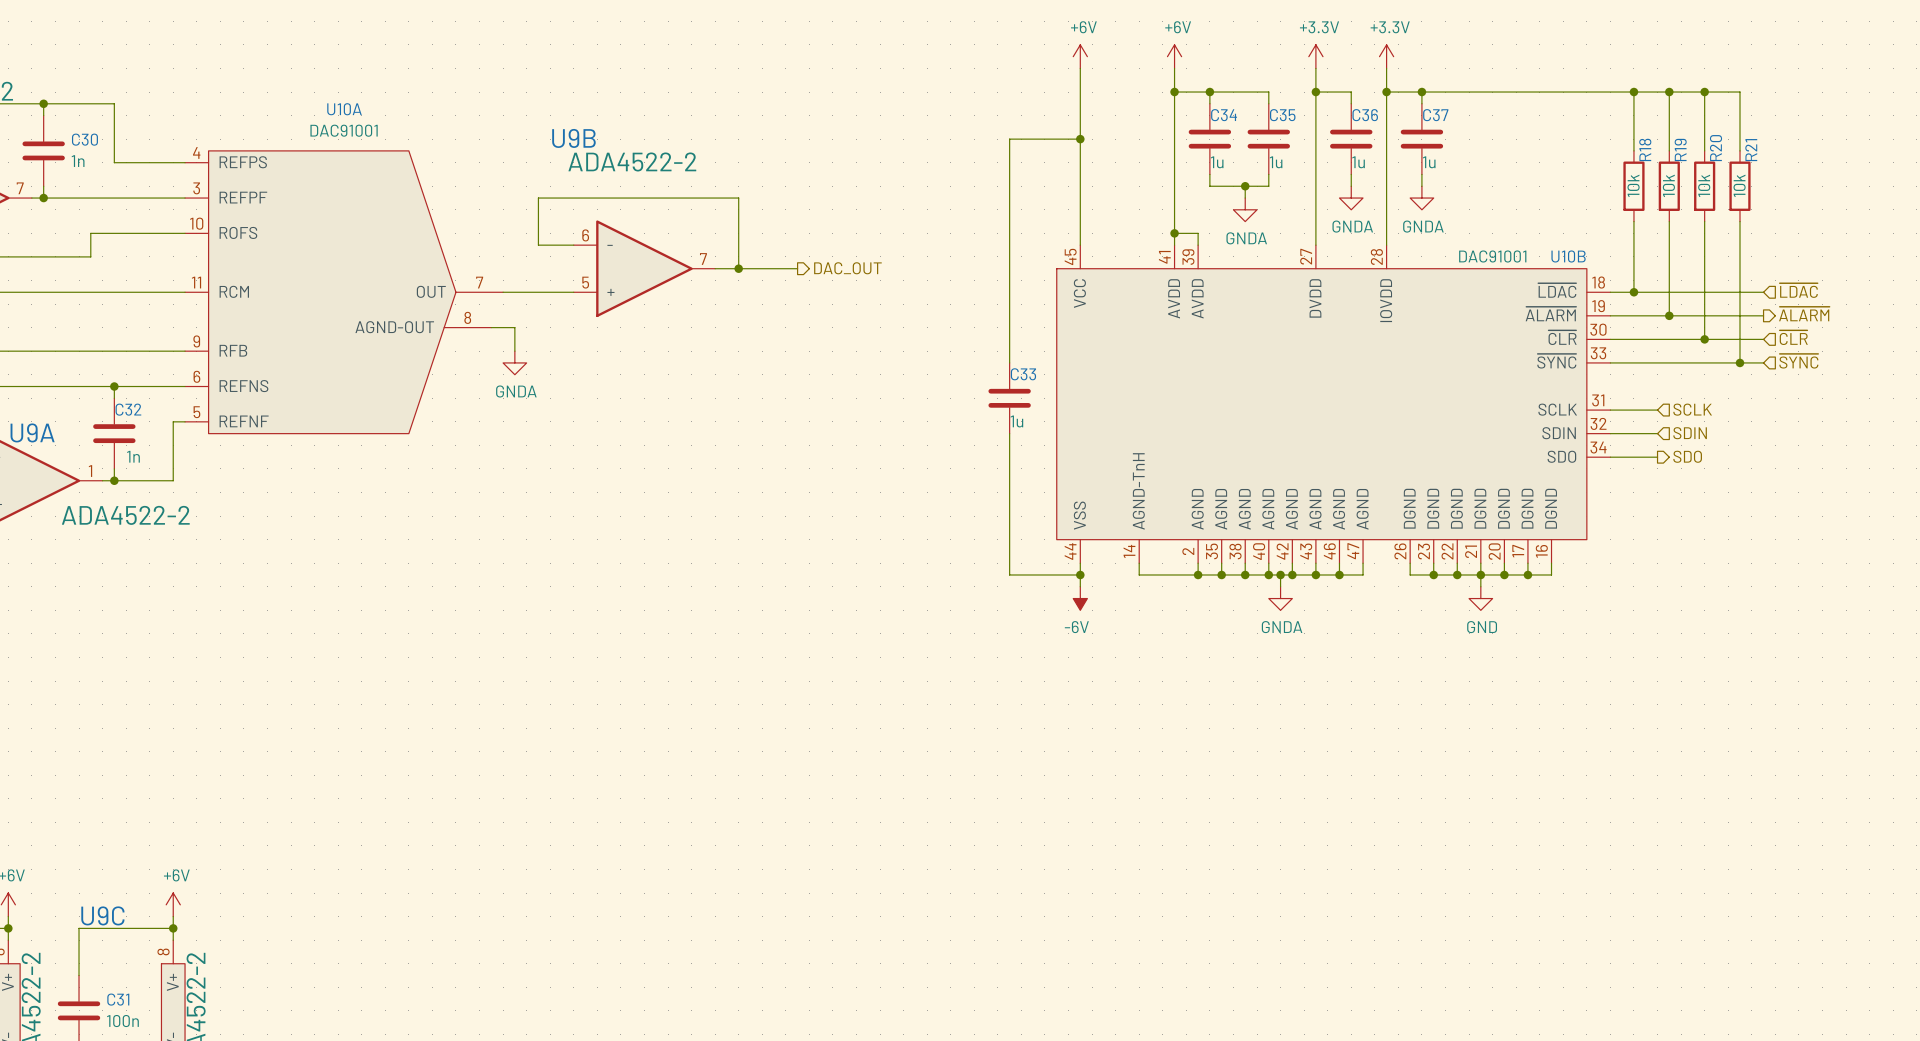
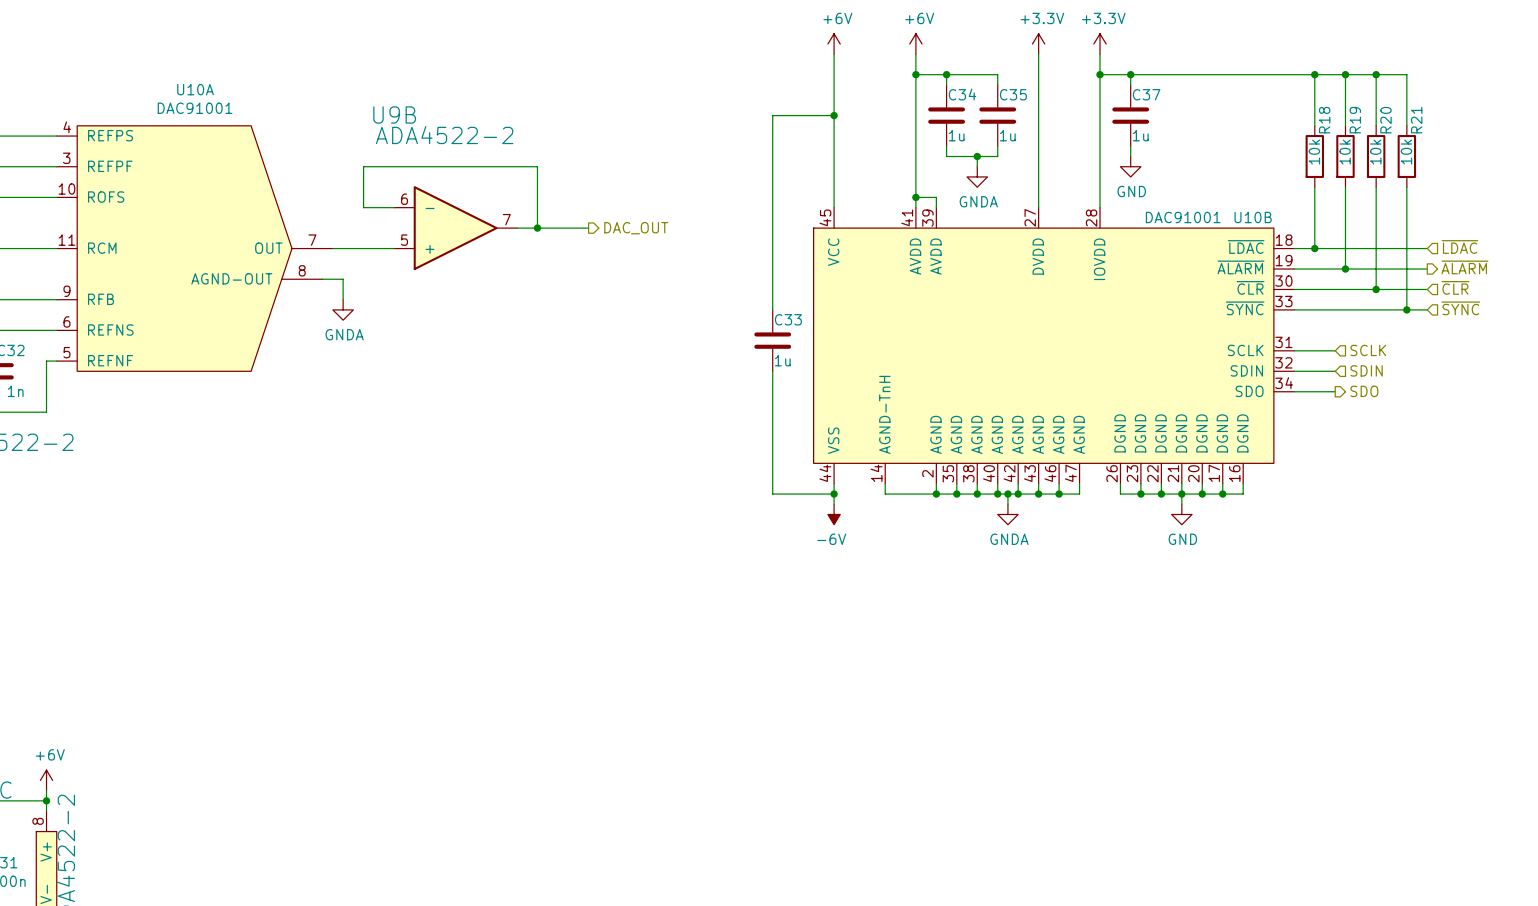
wire: (1315, 92) (1351, 92) (1351, 103) -> none
junction: (1315, 92) -> none
C36: 1u (1351, 139) -> none
wire: (1351, 174) (1351, 186) -> none
power symbol: GNDA (1351, 198) -> none
power symbol: GNDA (1421, 198) -> GND (1130, 166)

